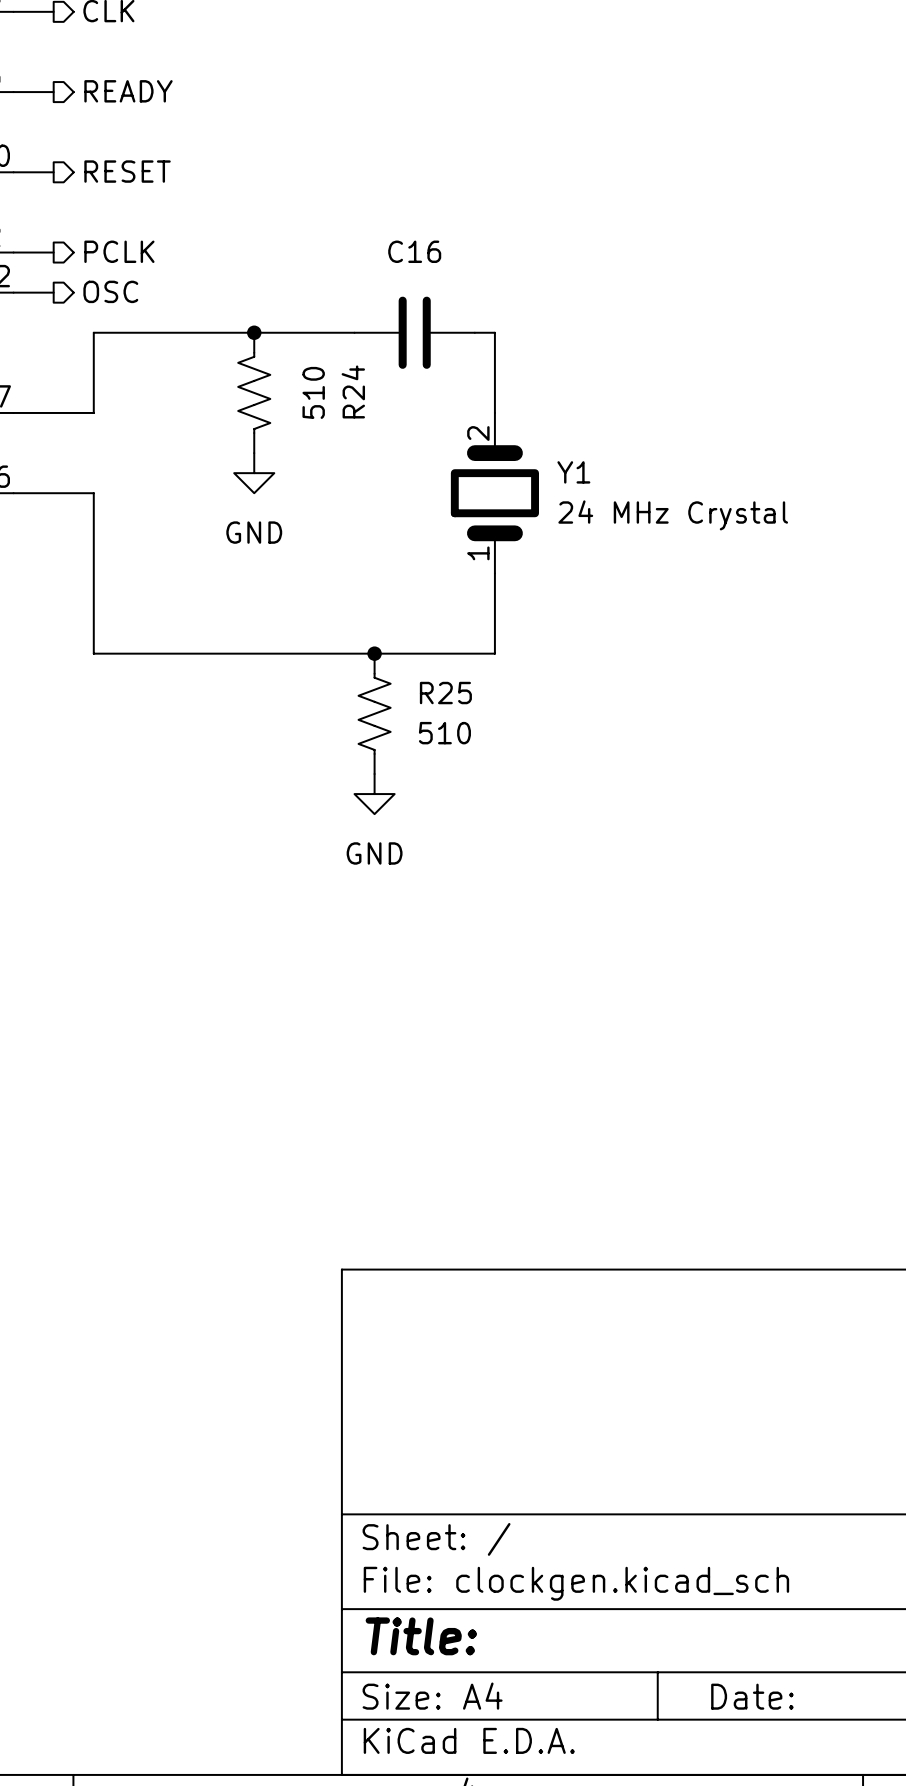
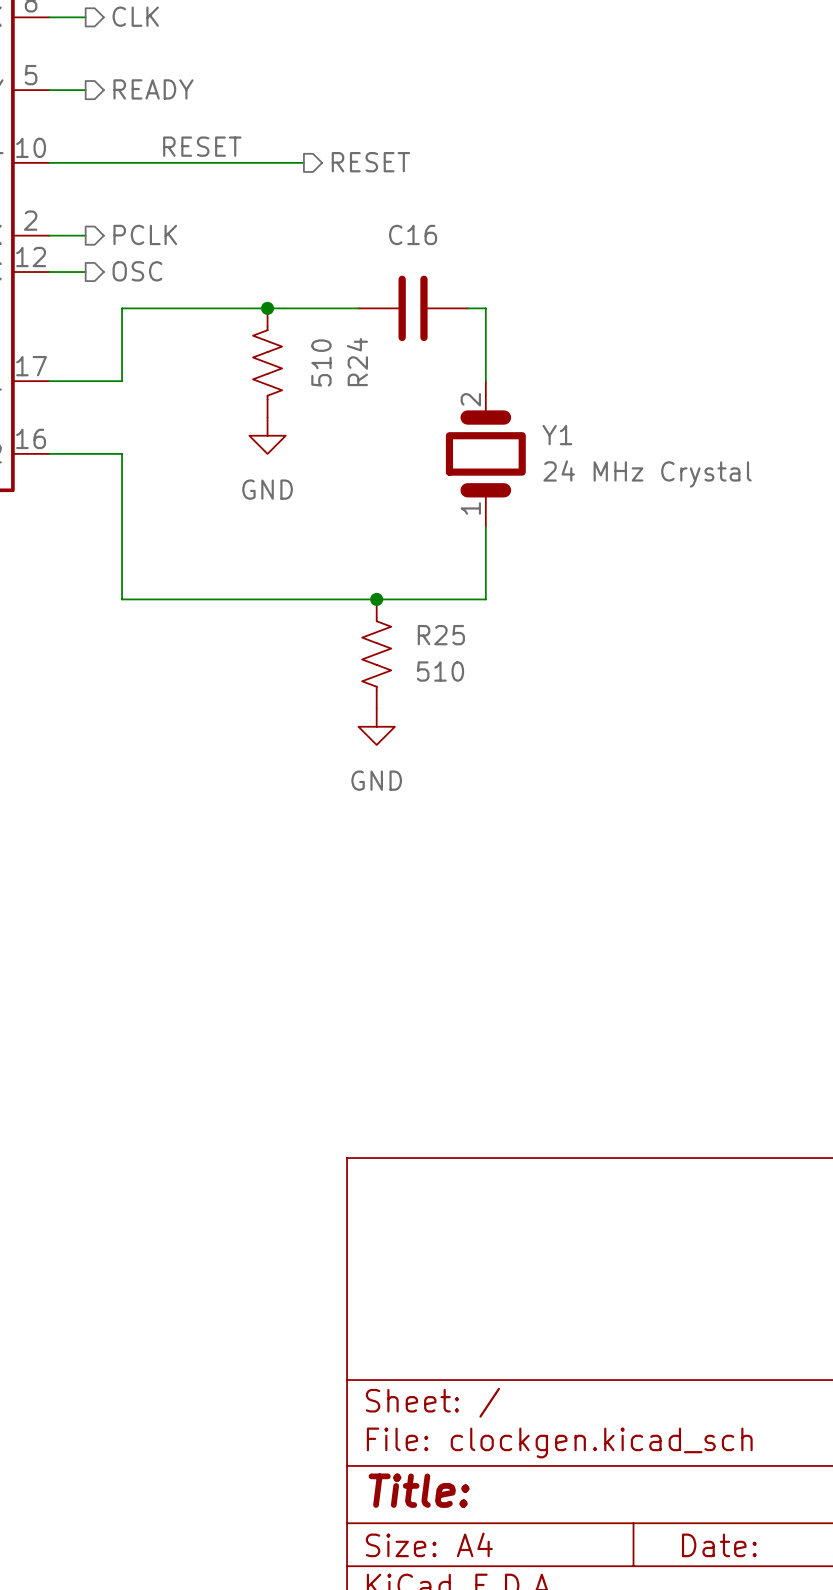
label: none -> RESET (202, 146)
hierarchical label position: RESET (127, 171) -> RESET (370, 162)
wire: none -> (85, 162) (303, 162)

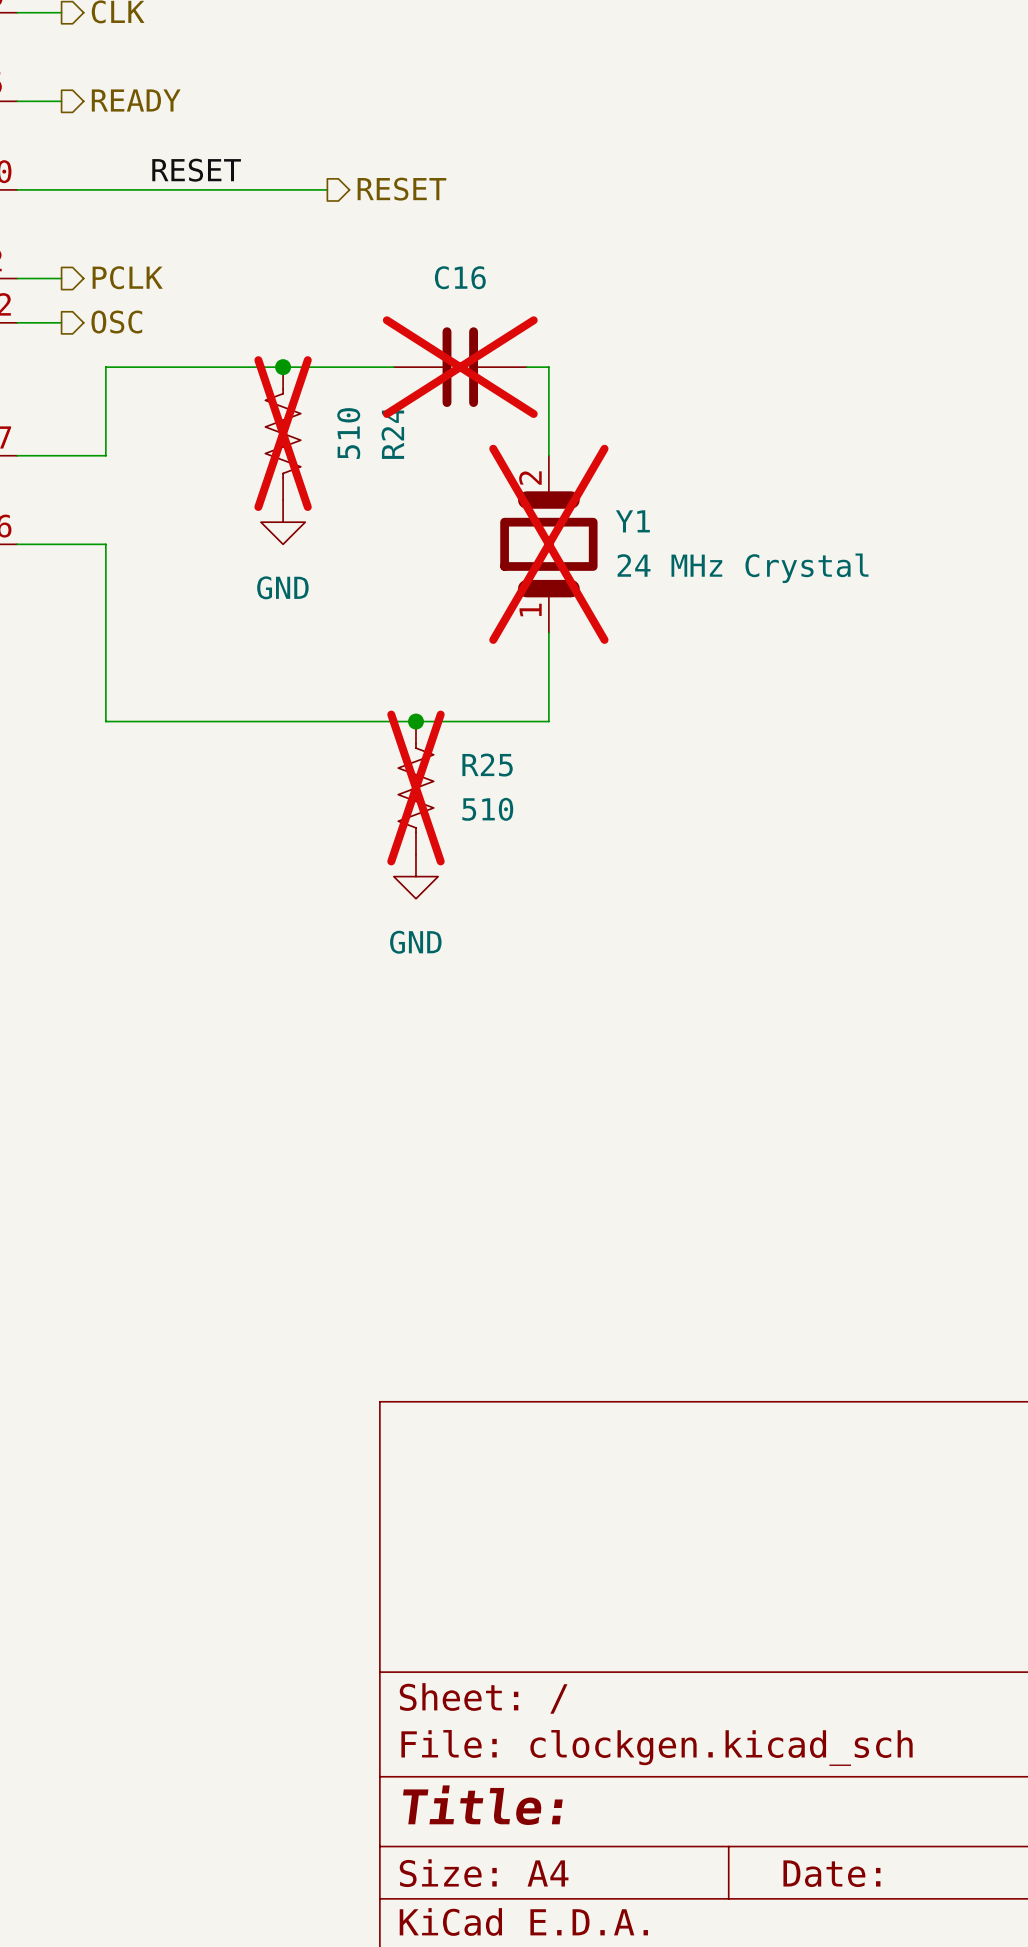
C16 do-not-place cross: none -> (460, 367)
R24 do-not-place cross: none -> (283, 433)
Y1 do-not-place cross: none -> (548, 544)
R25 do-not-place cross: none -> (415, 788)

